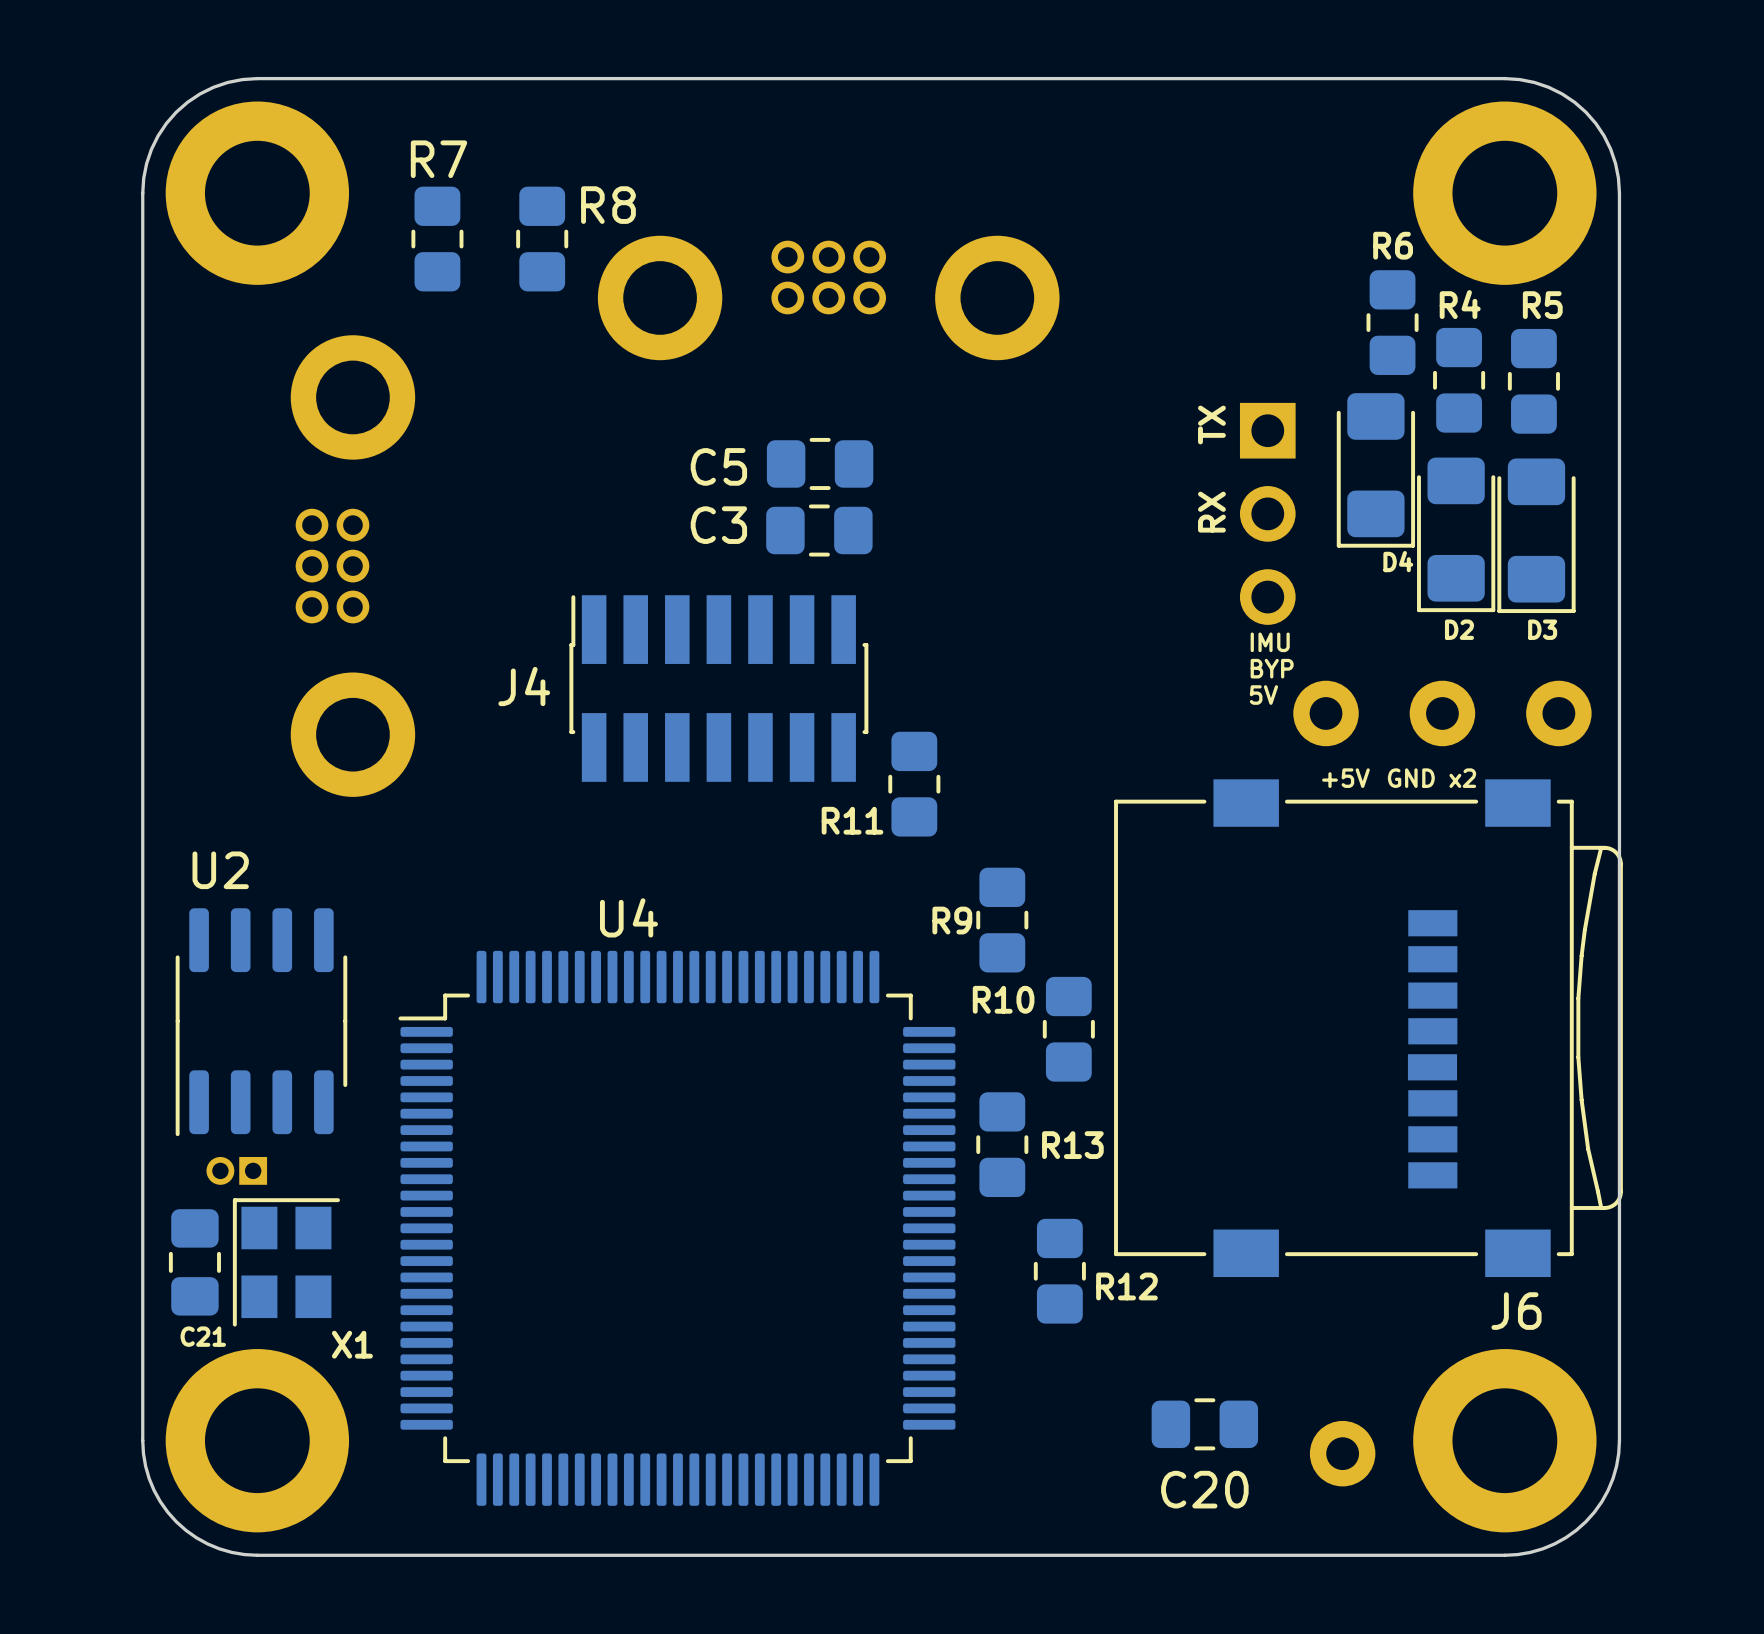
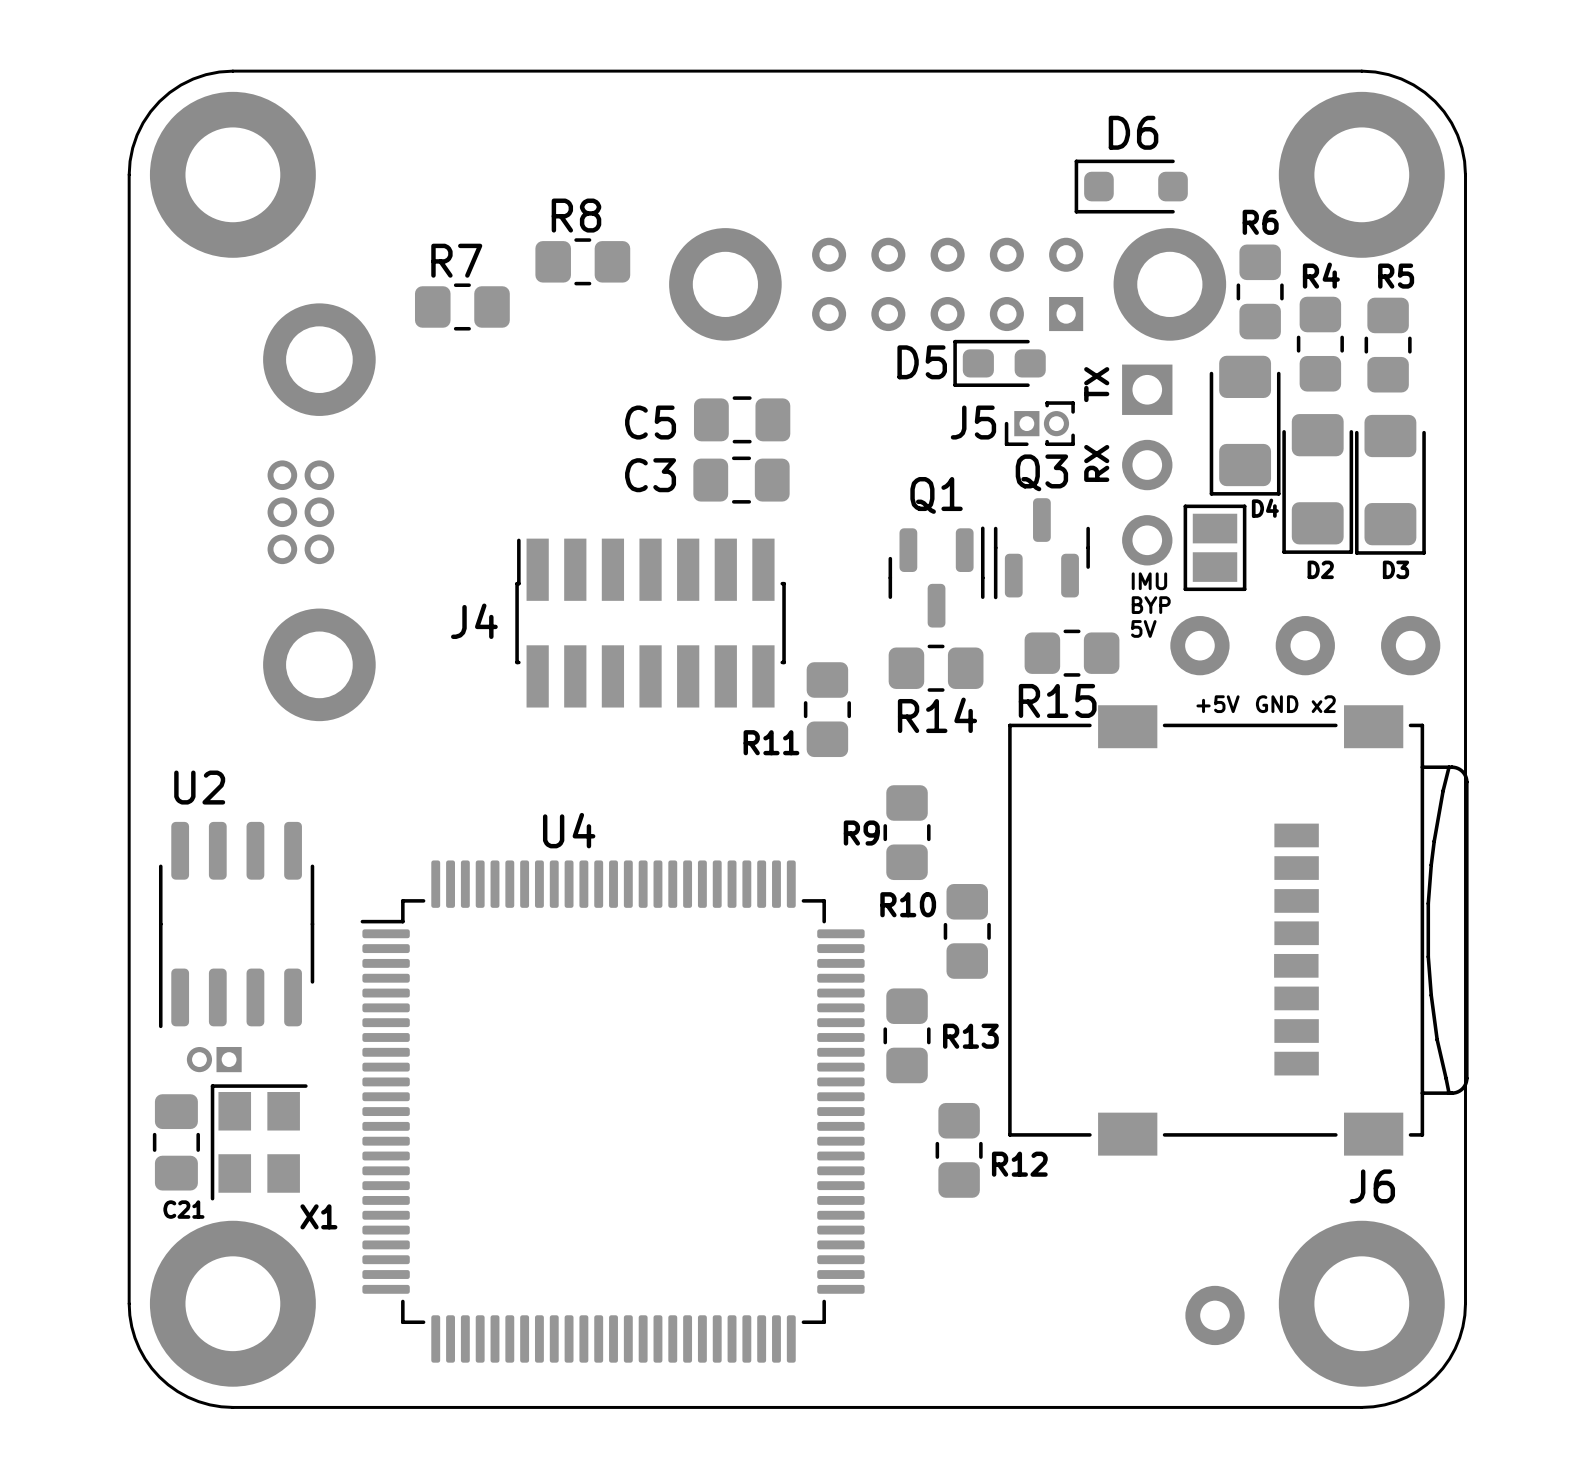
R8 name position: R8 (608, 205) -> R8 (576, 215)
D6: none -> (1131, 186)
R7 rotation: 0° (437, 239) -> 90° clockwise (462, 306)
R7 position: (437, 239) -> (462, 306)
R8 rotation: 0° (542, 239) -> 90° clockwise (582, 261)
R8 position: (542, 239) -> (582, 261)
part: (828, 297) -> none
part: none -> (947, 284)
D5: none -> (999, 363)
J5: none -> (1039, 423)
part: none -> (1215, 547)
Q3: none -> (1041, 548)
Q1: none -> (936, 577)
R15: none -> (1072, 653)
R14: none -> (936, 668)
C20: (1204, 1424) -> none

